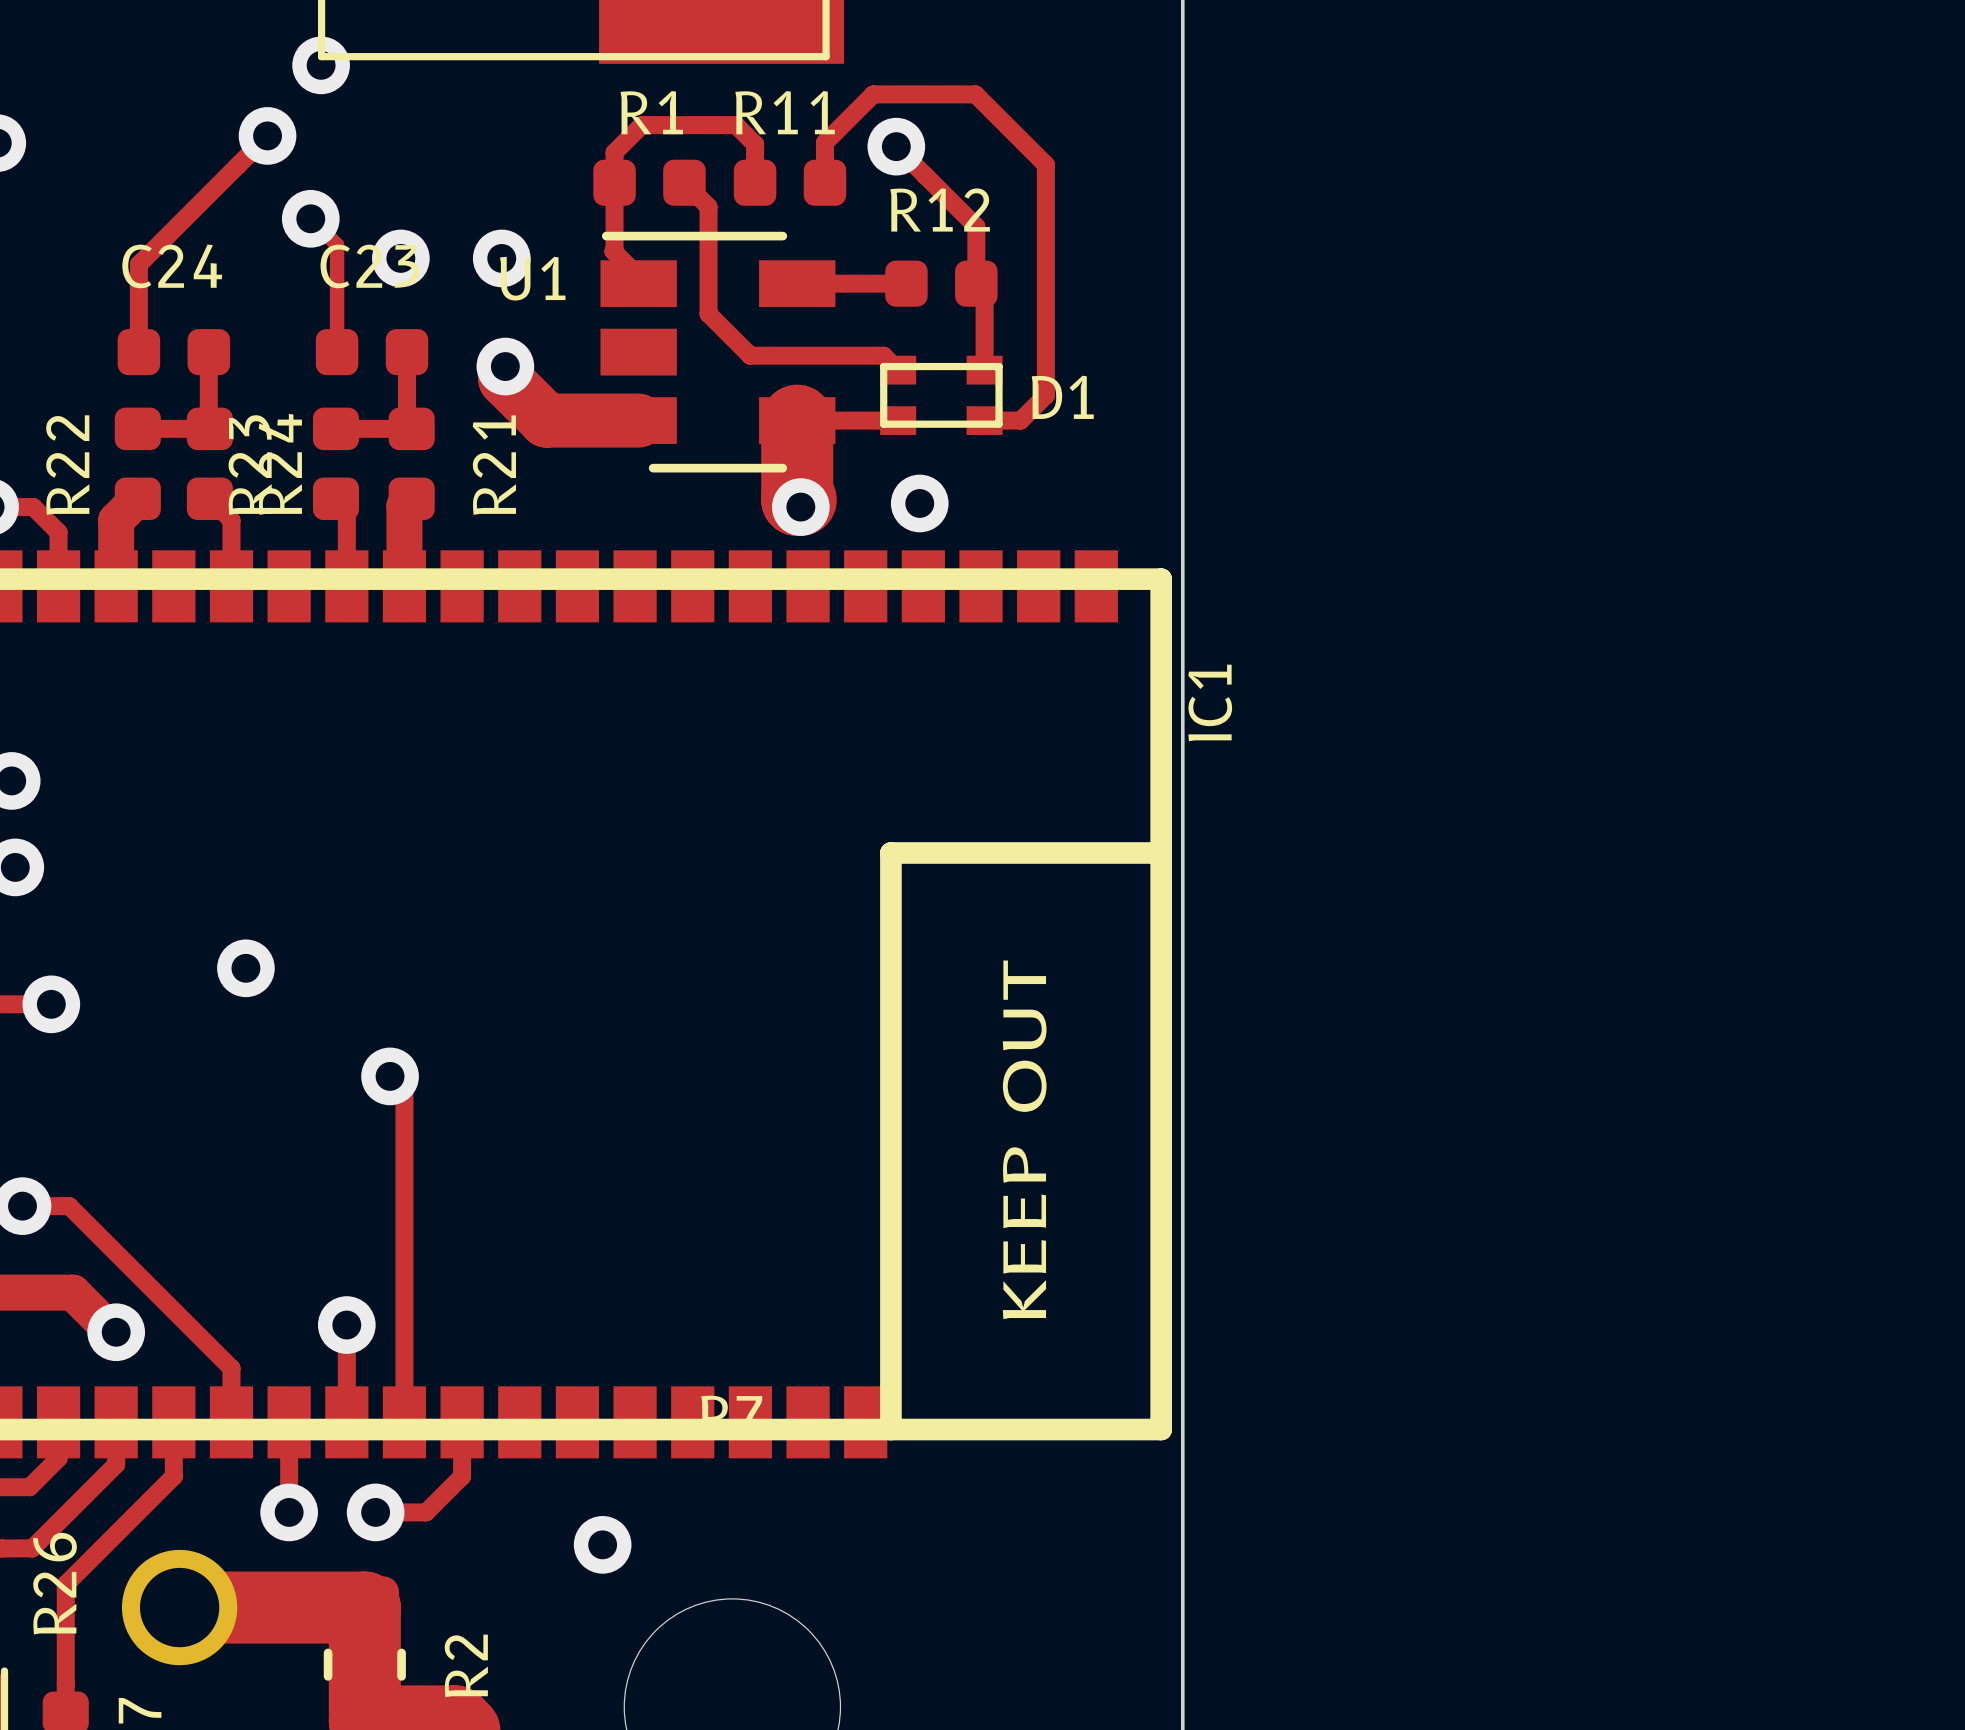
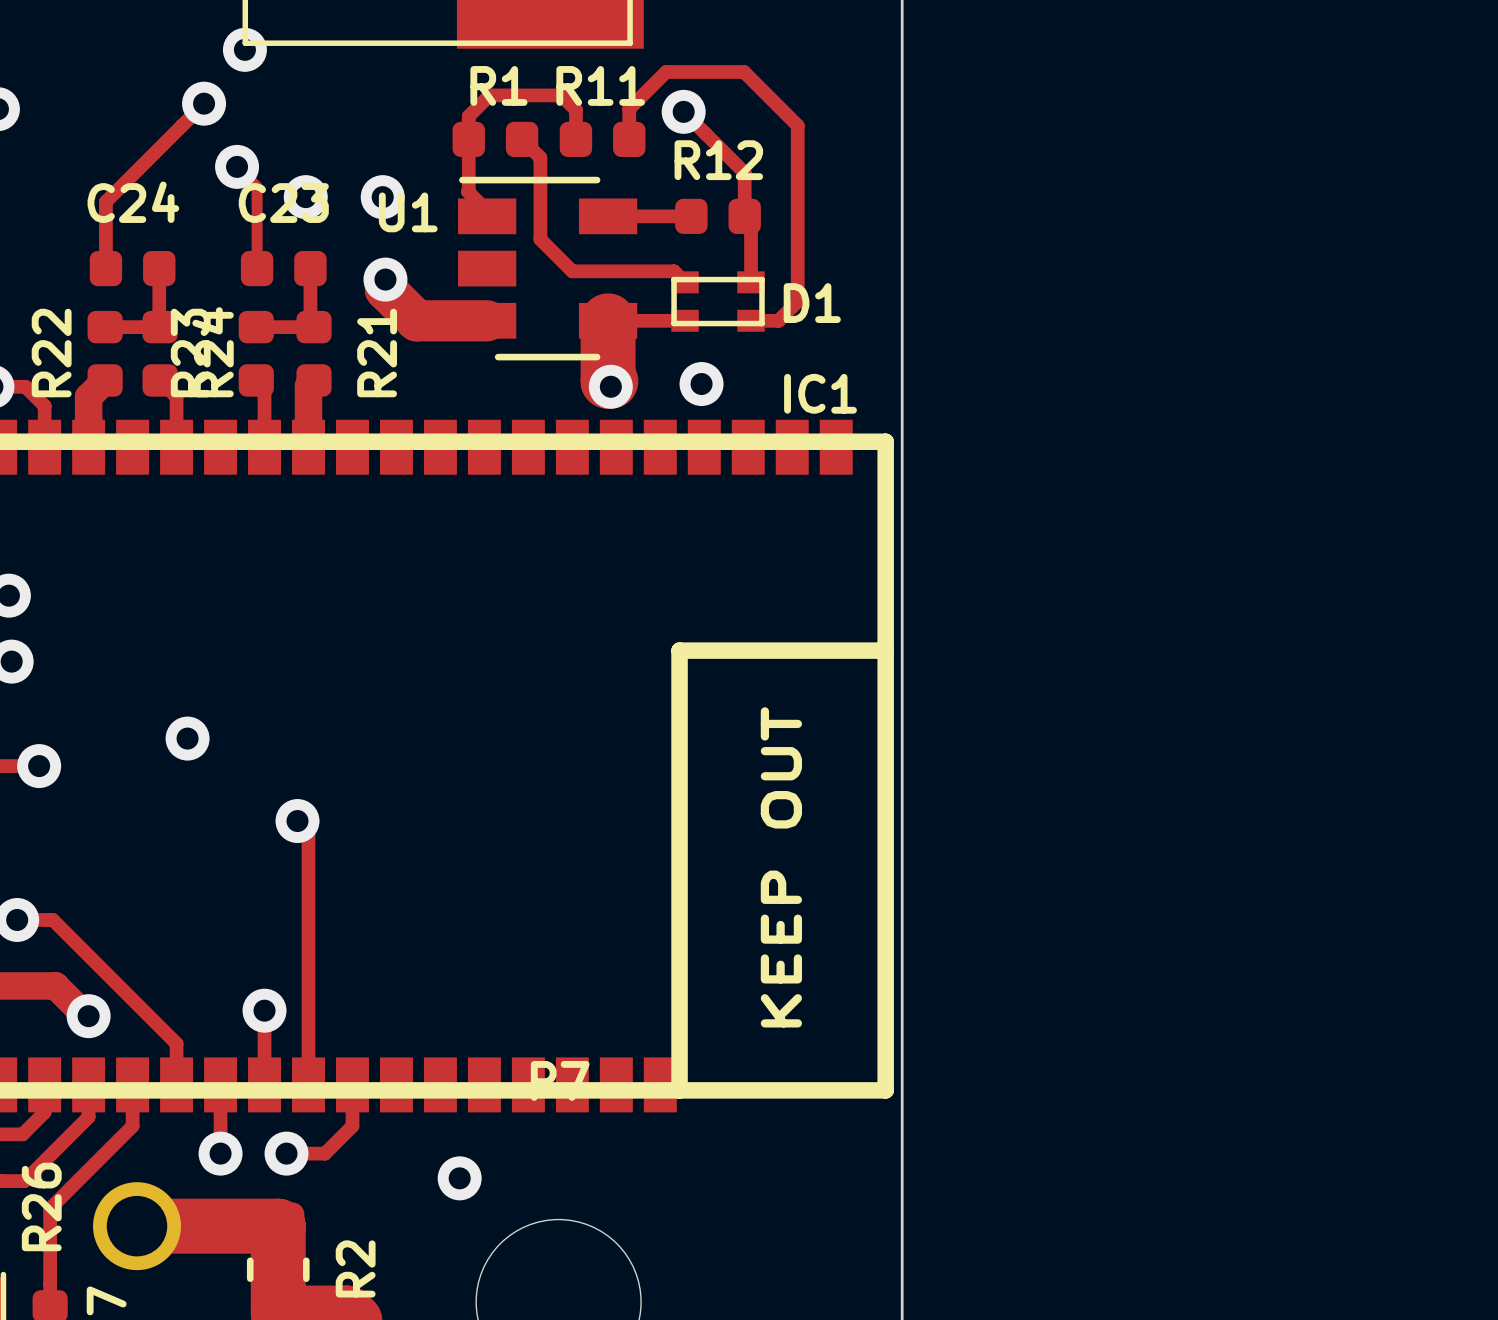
IC1 name rotation: 0° (1210, 702) -> 90° clockwise (820, 393)
IC1 name position: IC1 (1210, 702) -> IC1 (820, 393)

